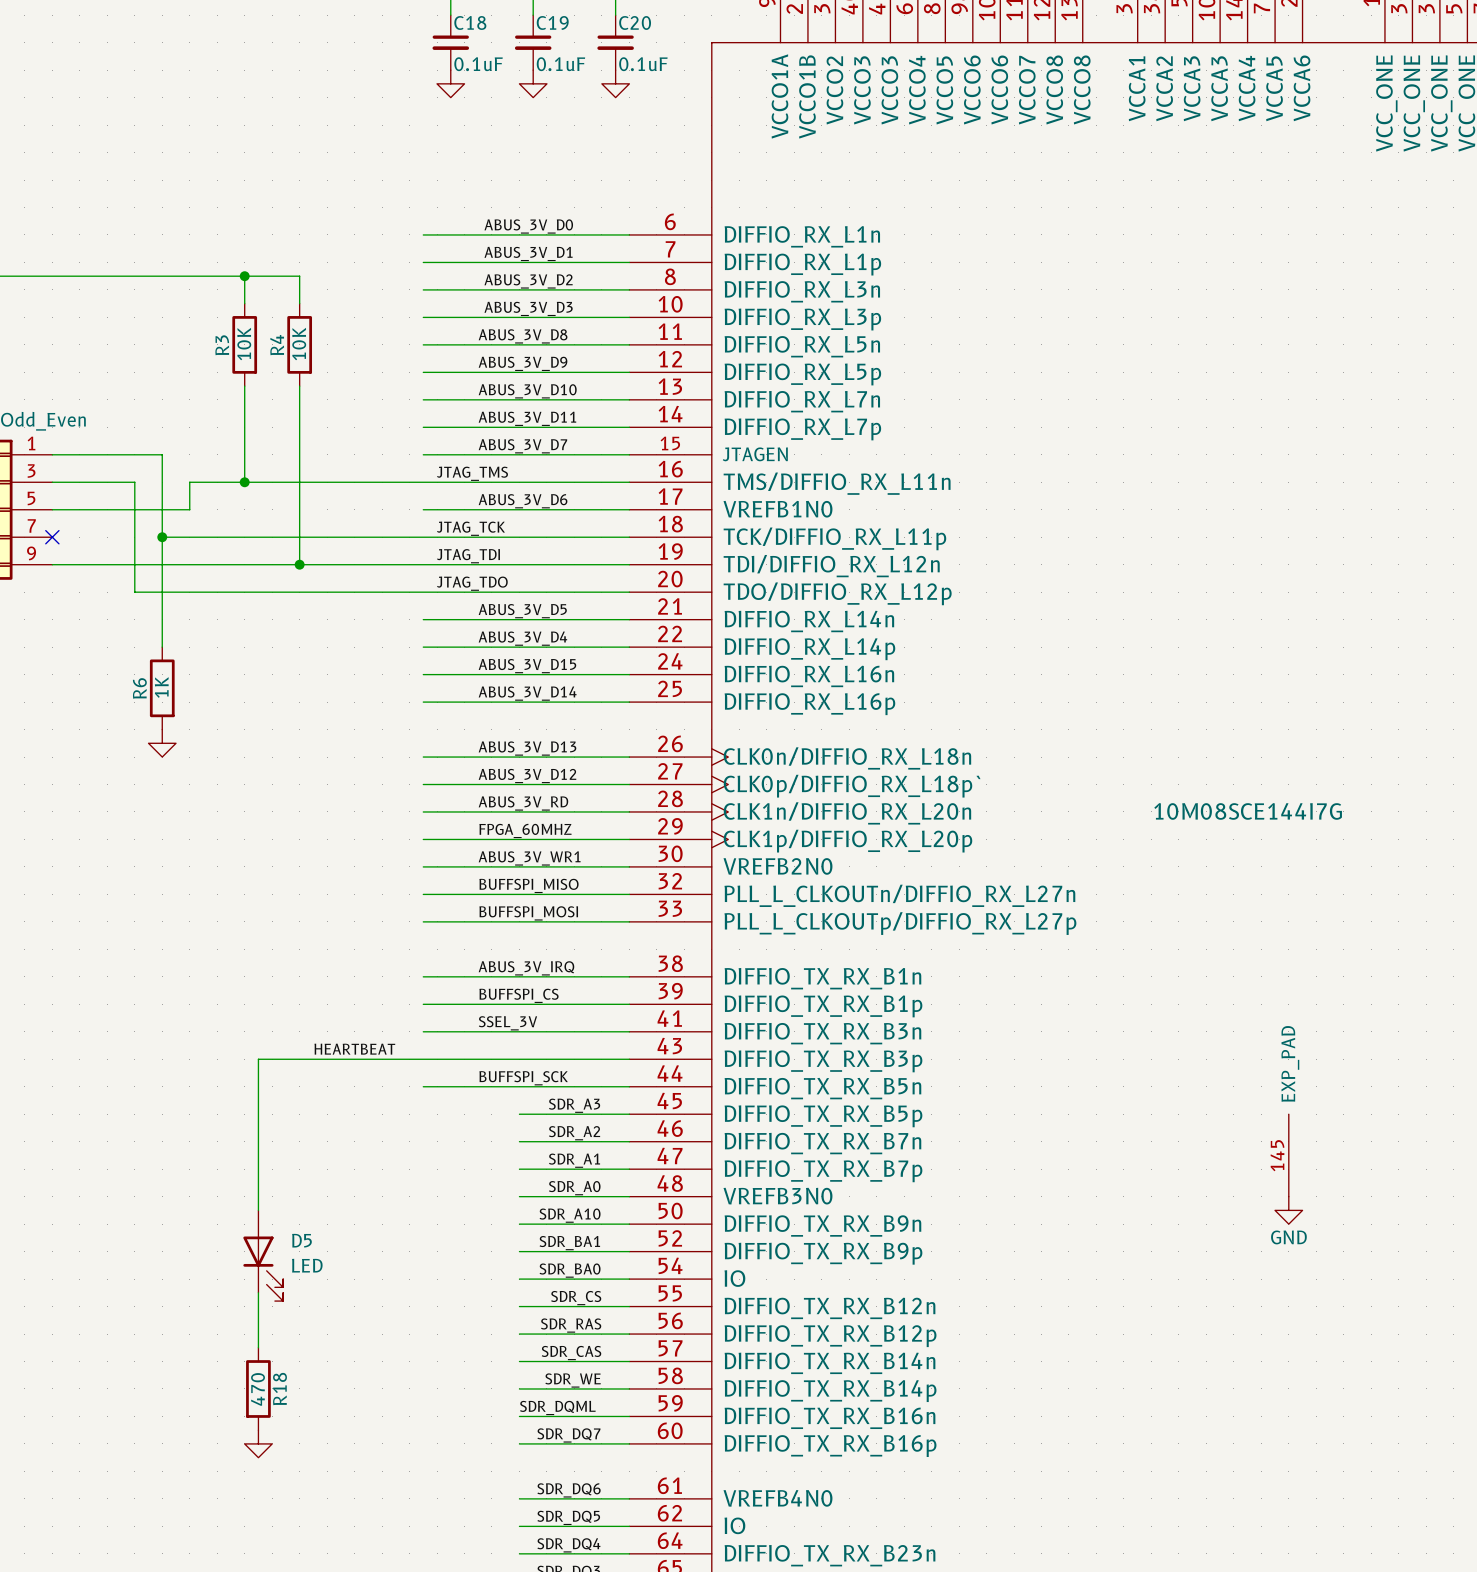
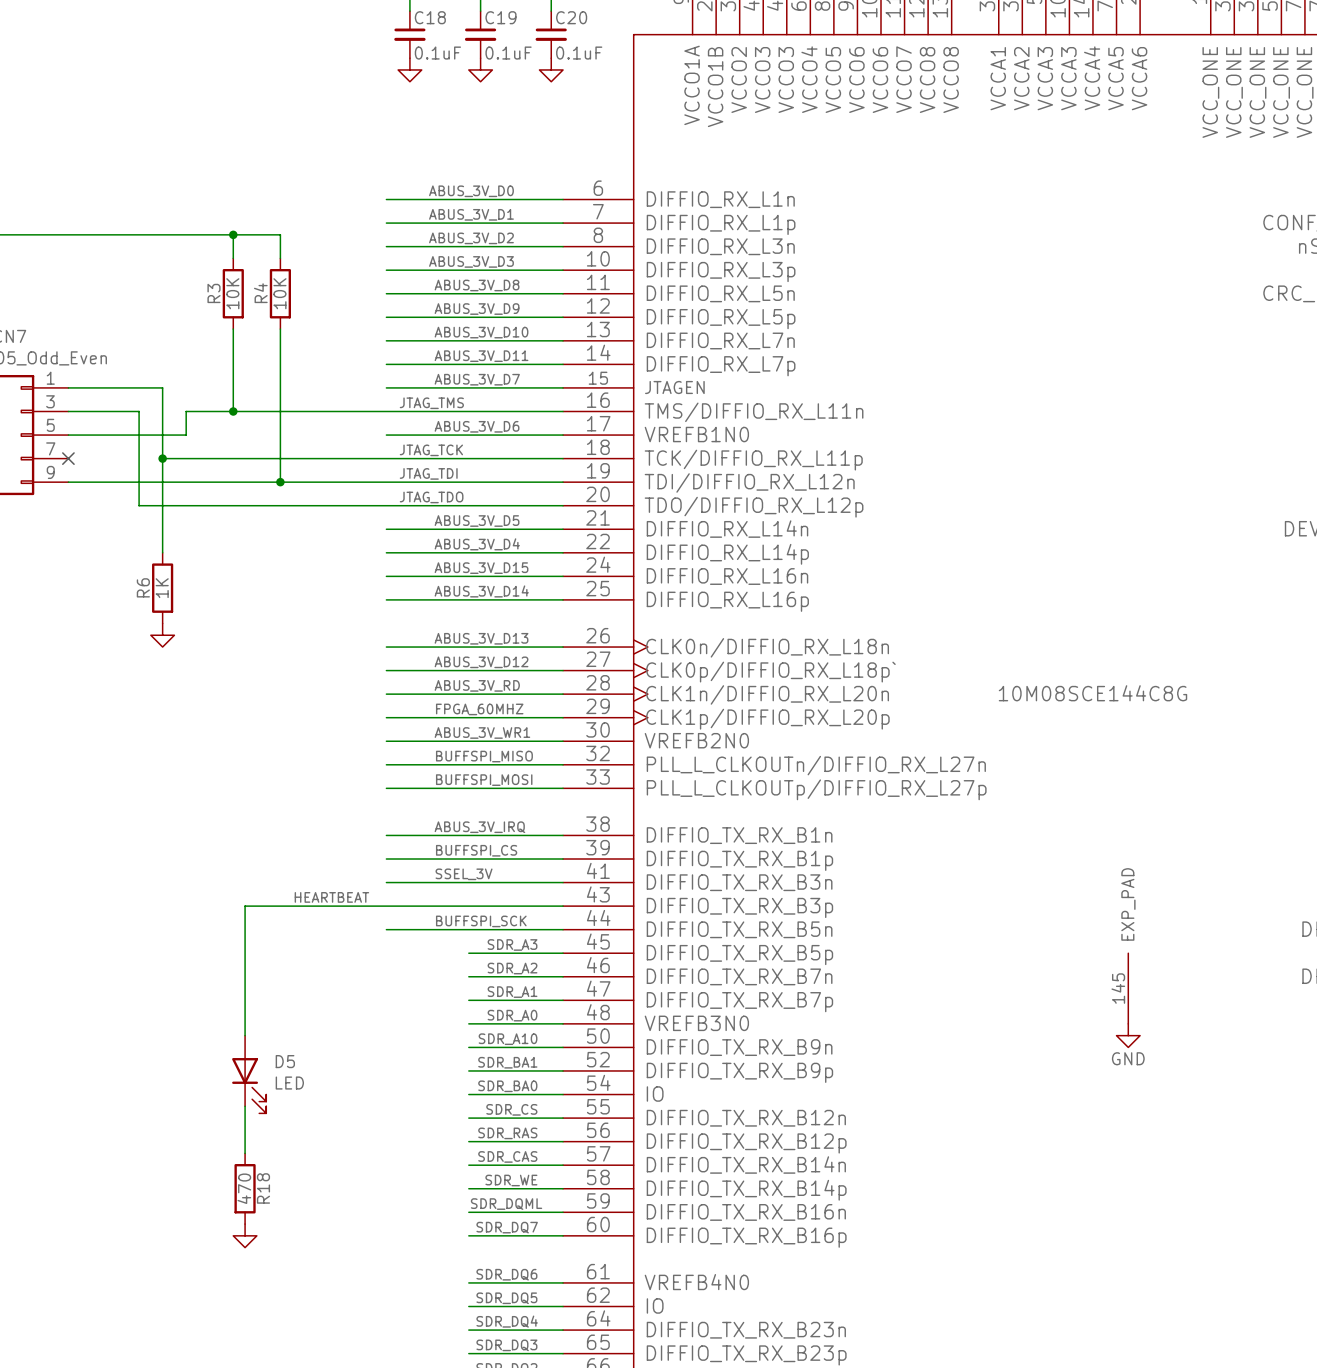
part value: 10M08SCE144I7G (1248, 811) -> 10M08SCE144C8G (1092, 693)

